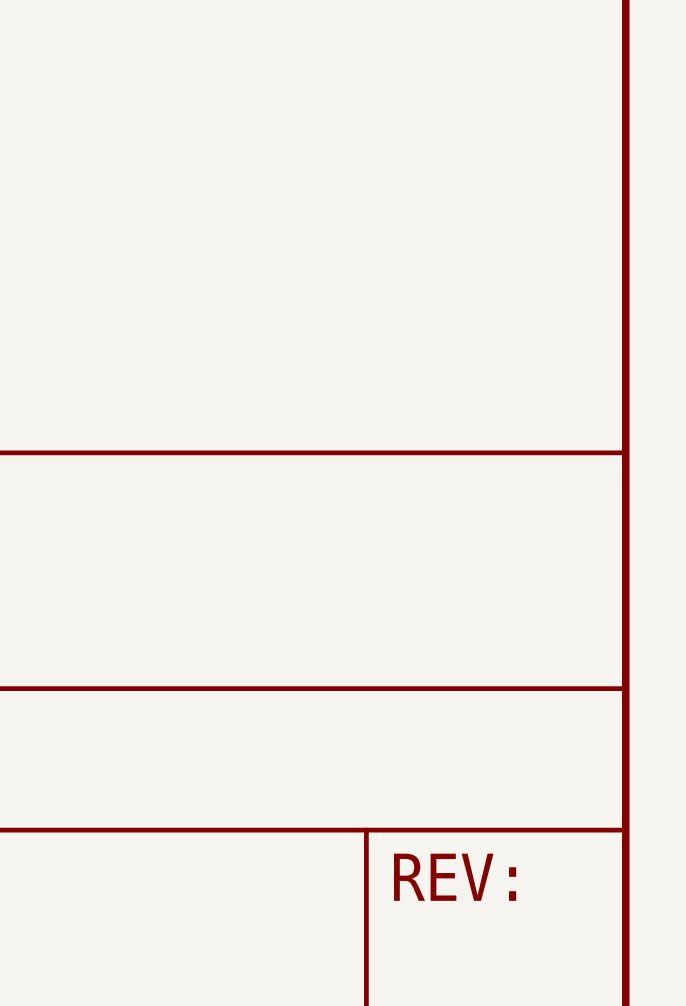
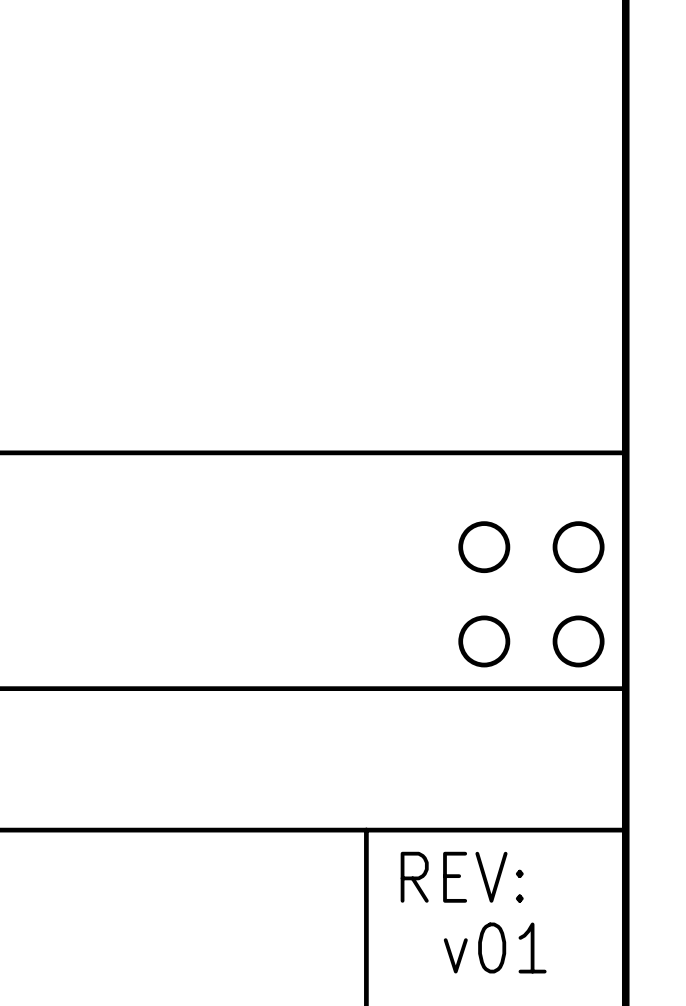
part: none -> (484, 547)
part: none -> (578, 547)
part: none -> (484, 641)
part: none -> (578, 641)
text: none -> v01 (495, 948)

